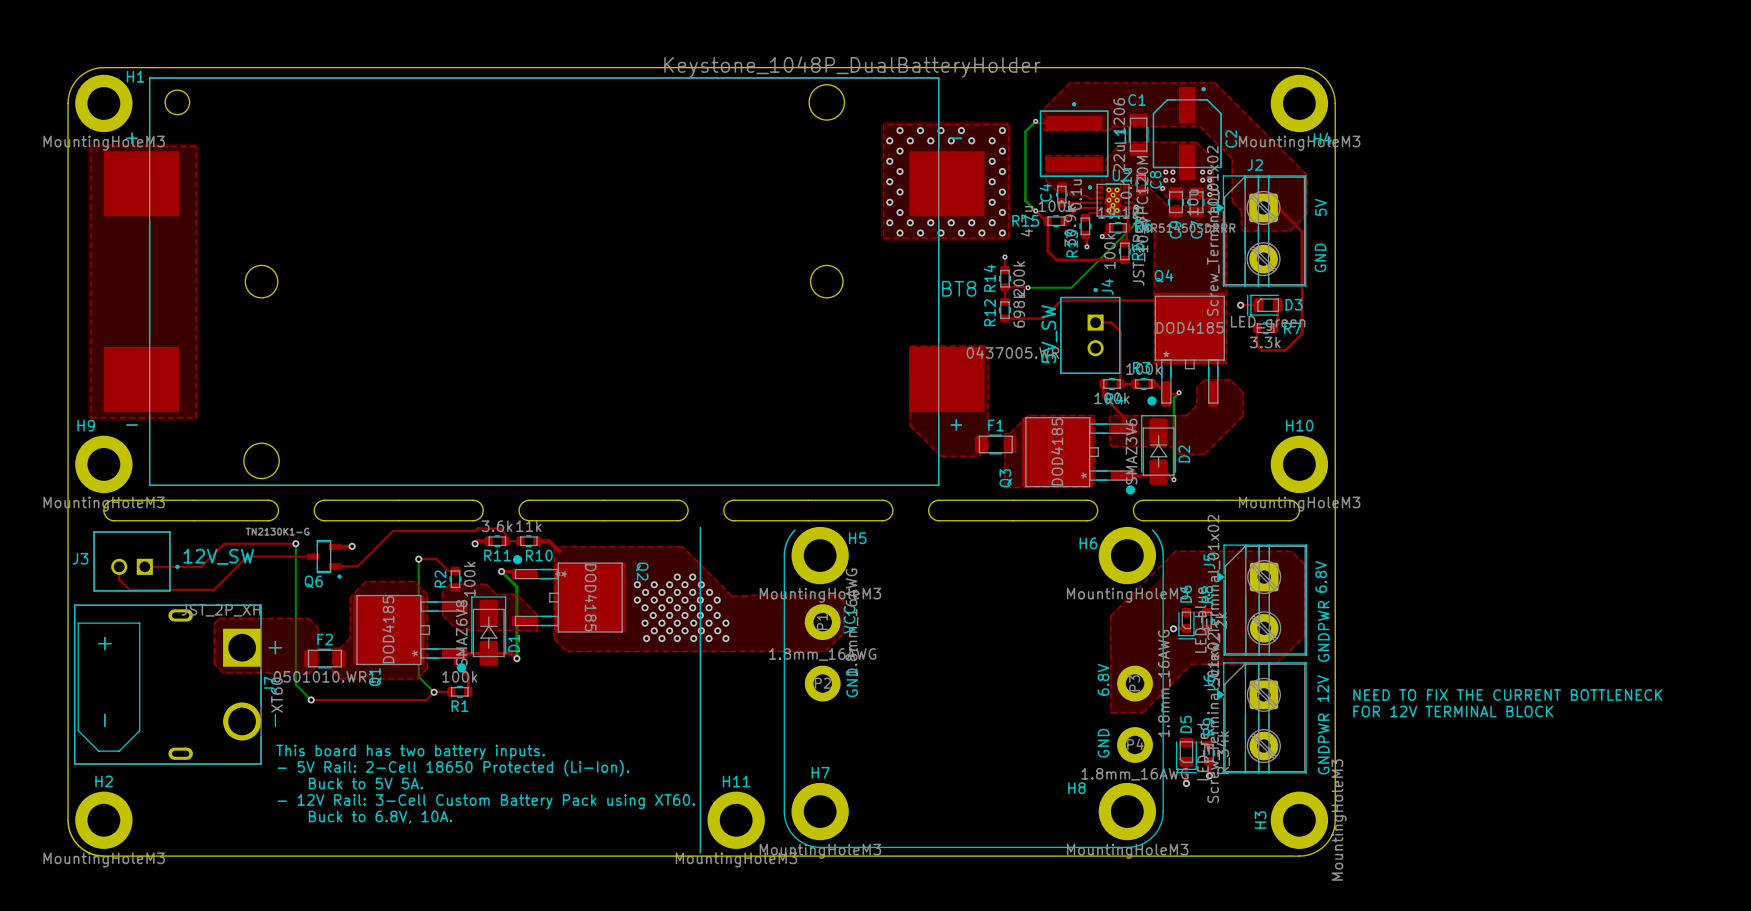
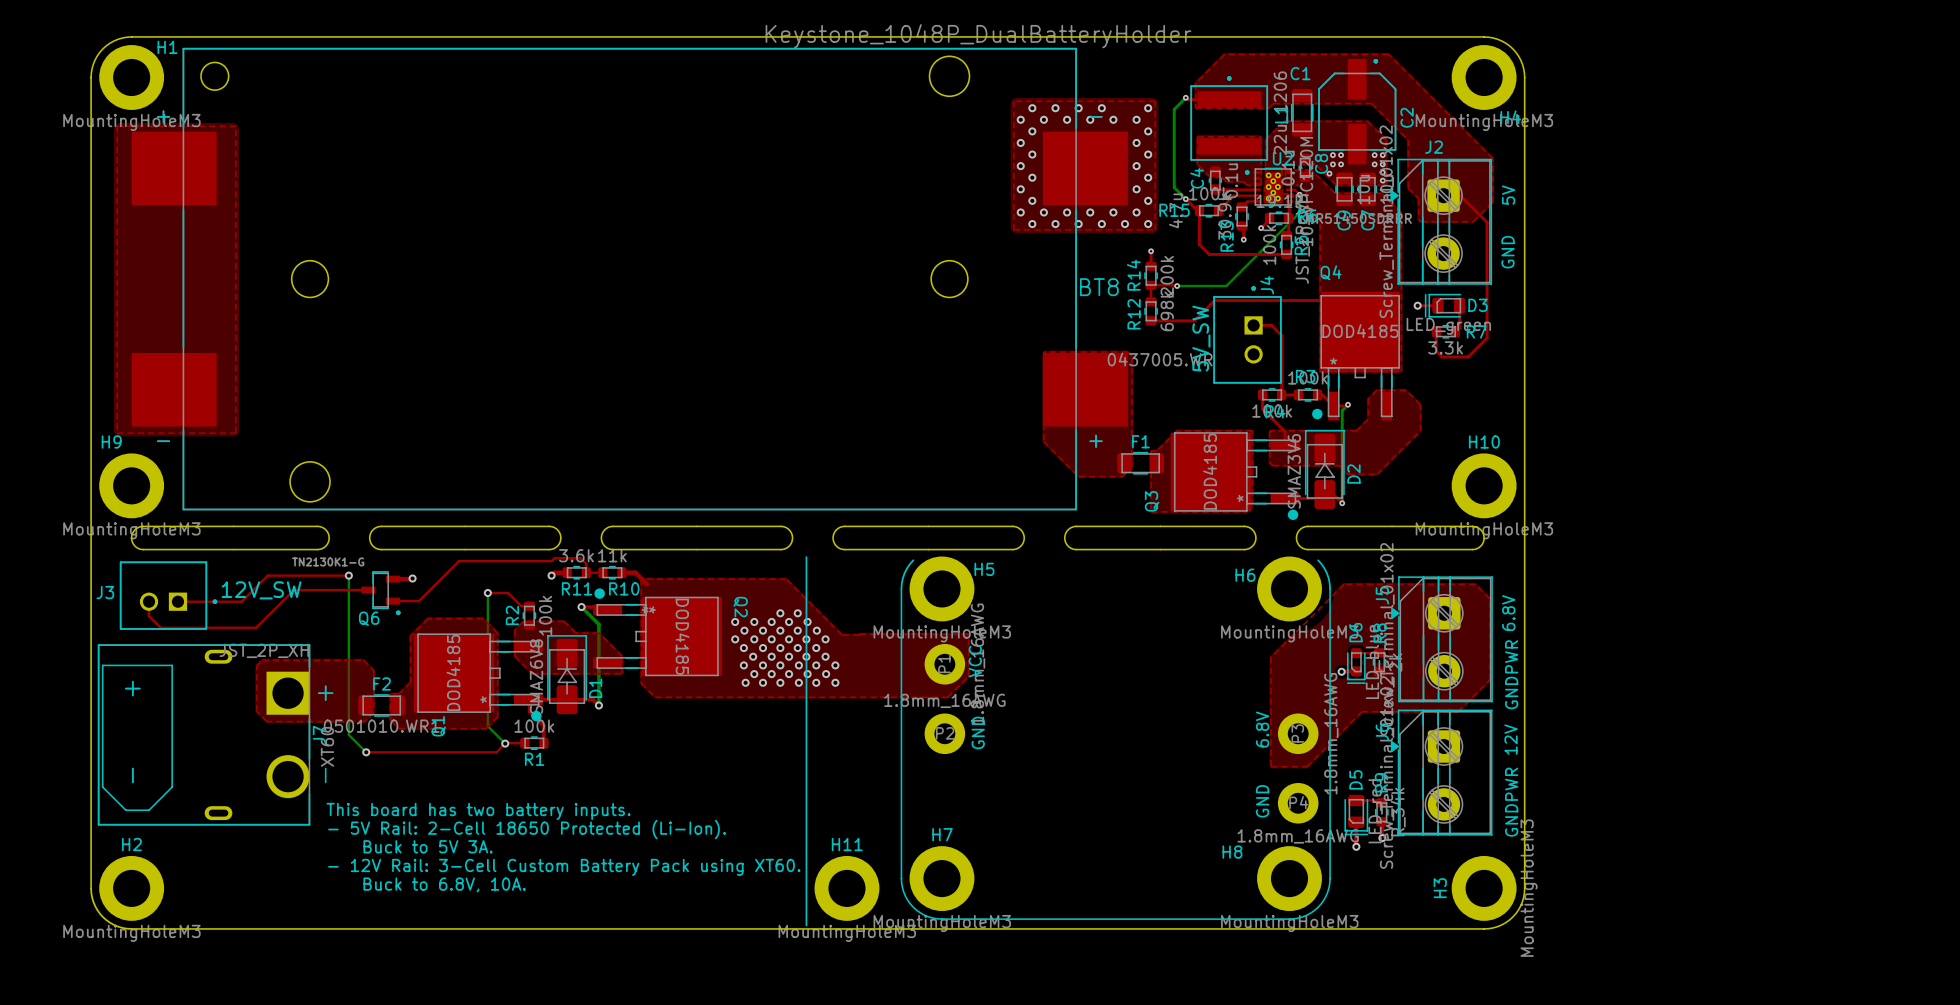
text: NEED TO FIX THE CURRENT BOTTLENECK (1507, 695) -> none
text: FOR 12V TERMINAL BLOCK (1453, 711) -> none
text: Buck to 5V 5A. (365, 783) -> Buck to 5V 3A. (428, 846)

